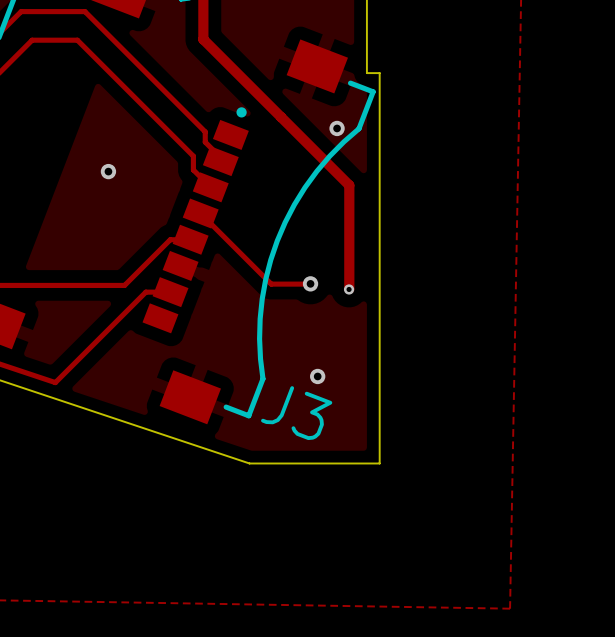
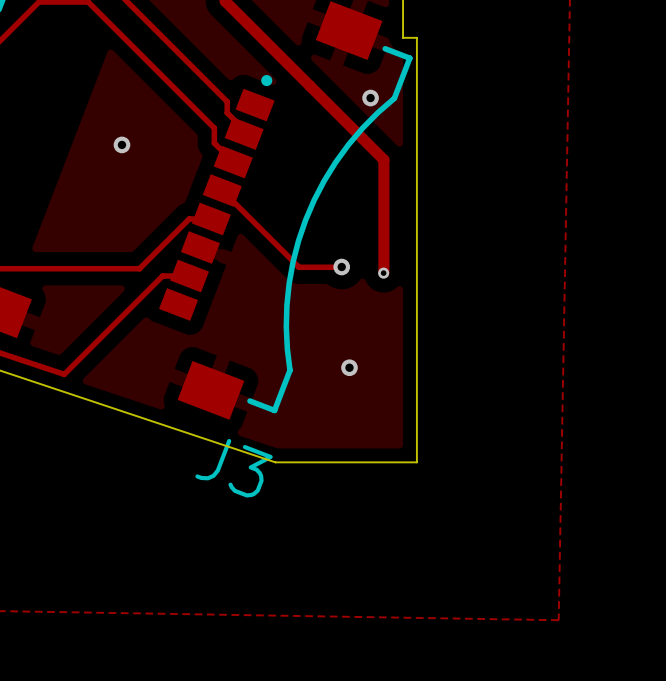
J3 name position: J3 (296, 413) -> J3 (234, 468)

